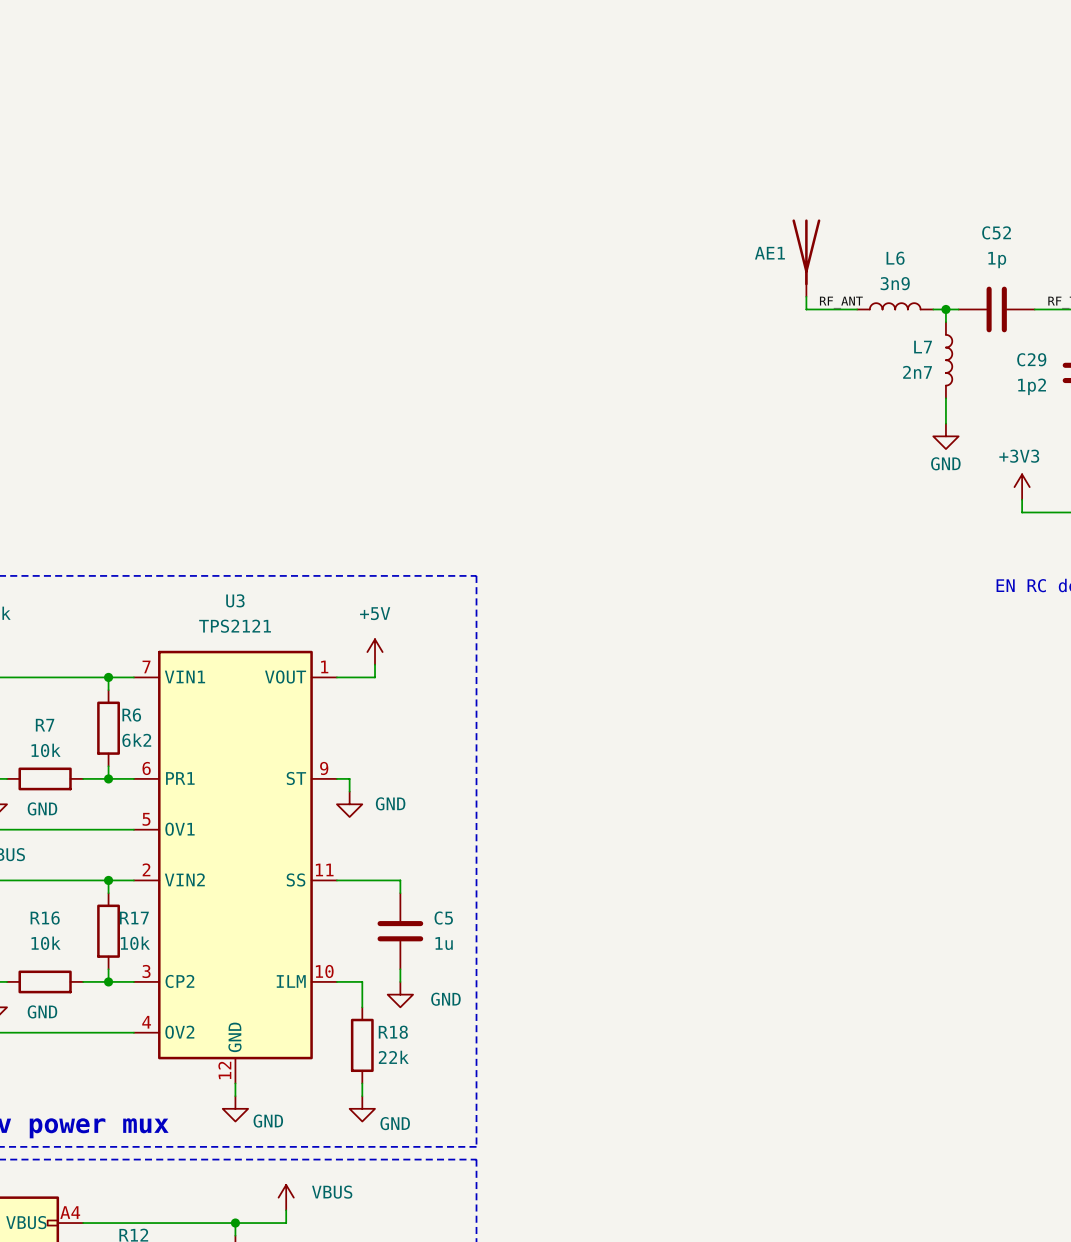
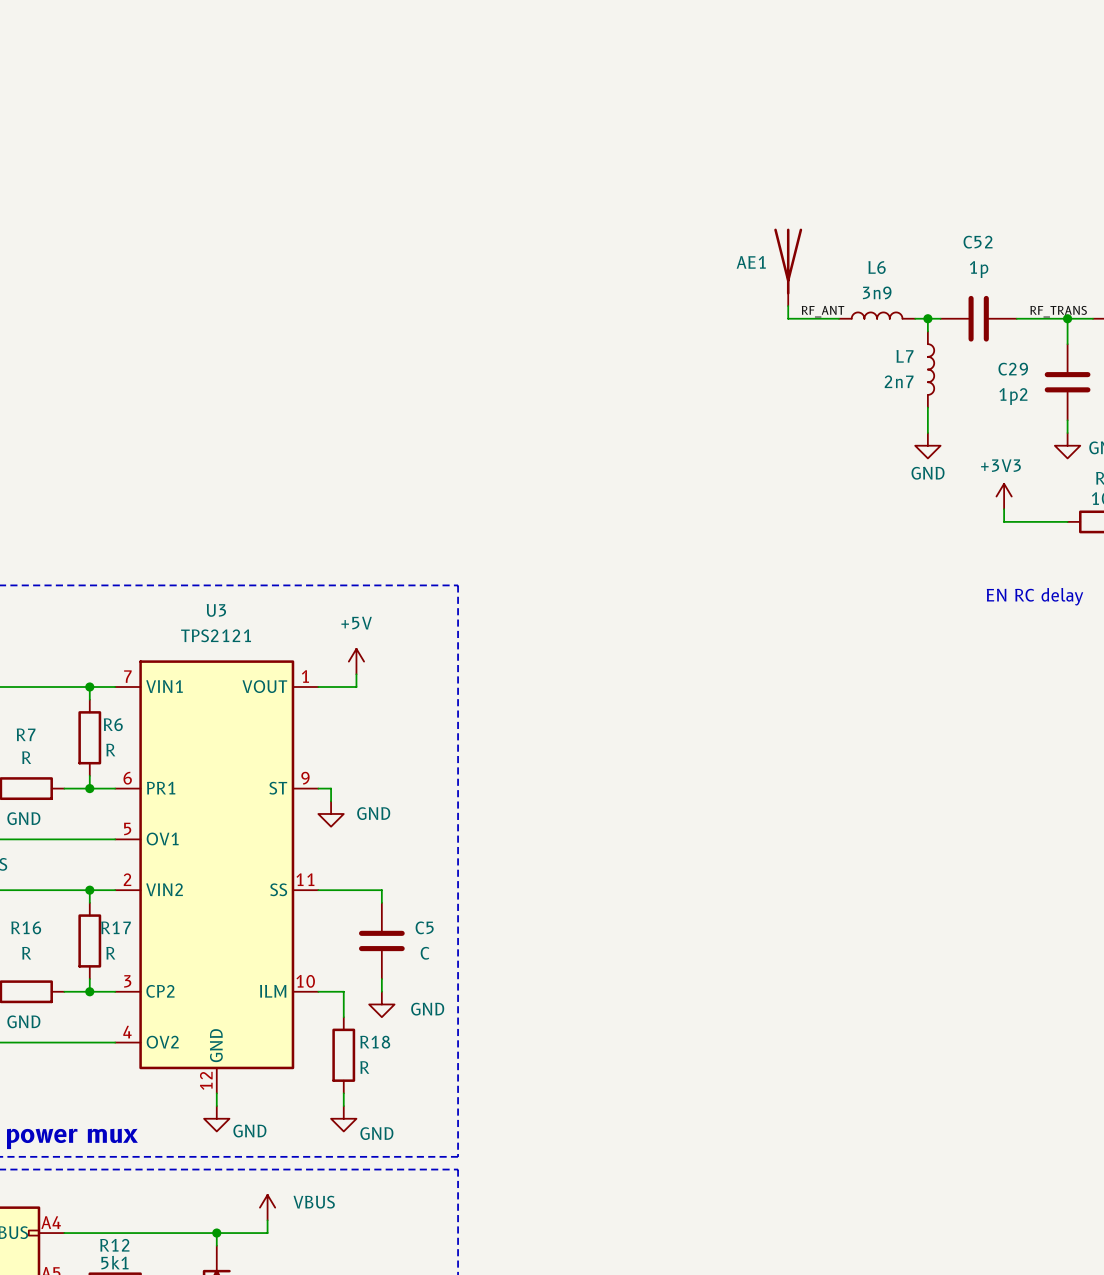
R6 value: 6k2 (136, 740) -> R (110, 750)
R7 value: 10k (46, 750) -> R (26, 757)
R16 value: 10k (46, 943) -> R (26, 953)
R17 value: 10k (135, 943) -> R (110, 953)
C5 value: 1u (444, 943) -> C (425, 953)
R18 value: 22k (393, 1057) -> R (364, 1067)

